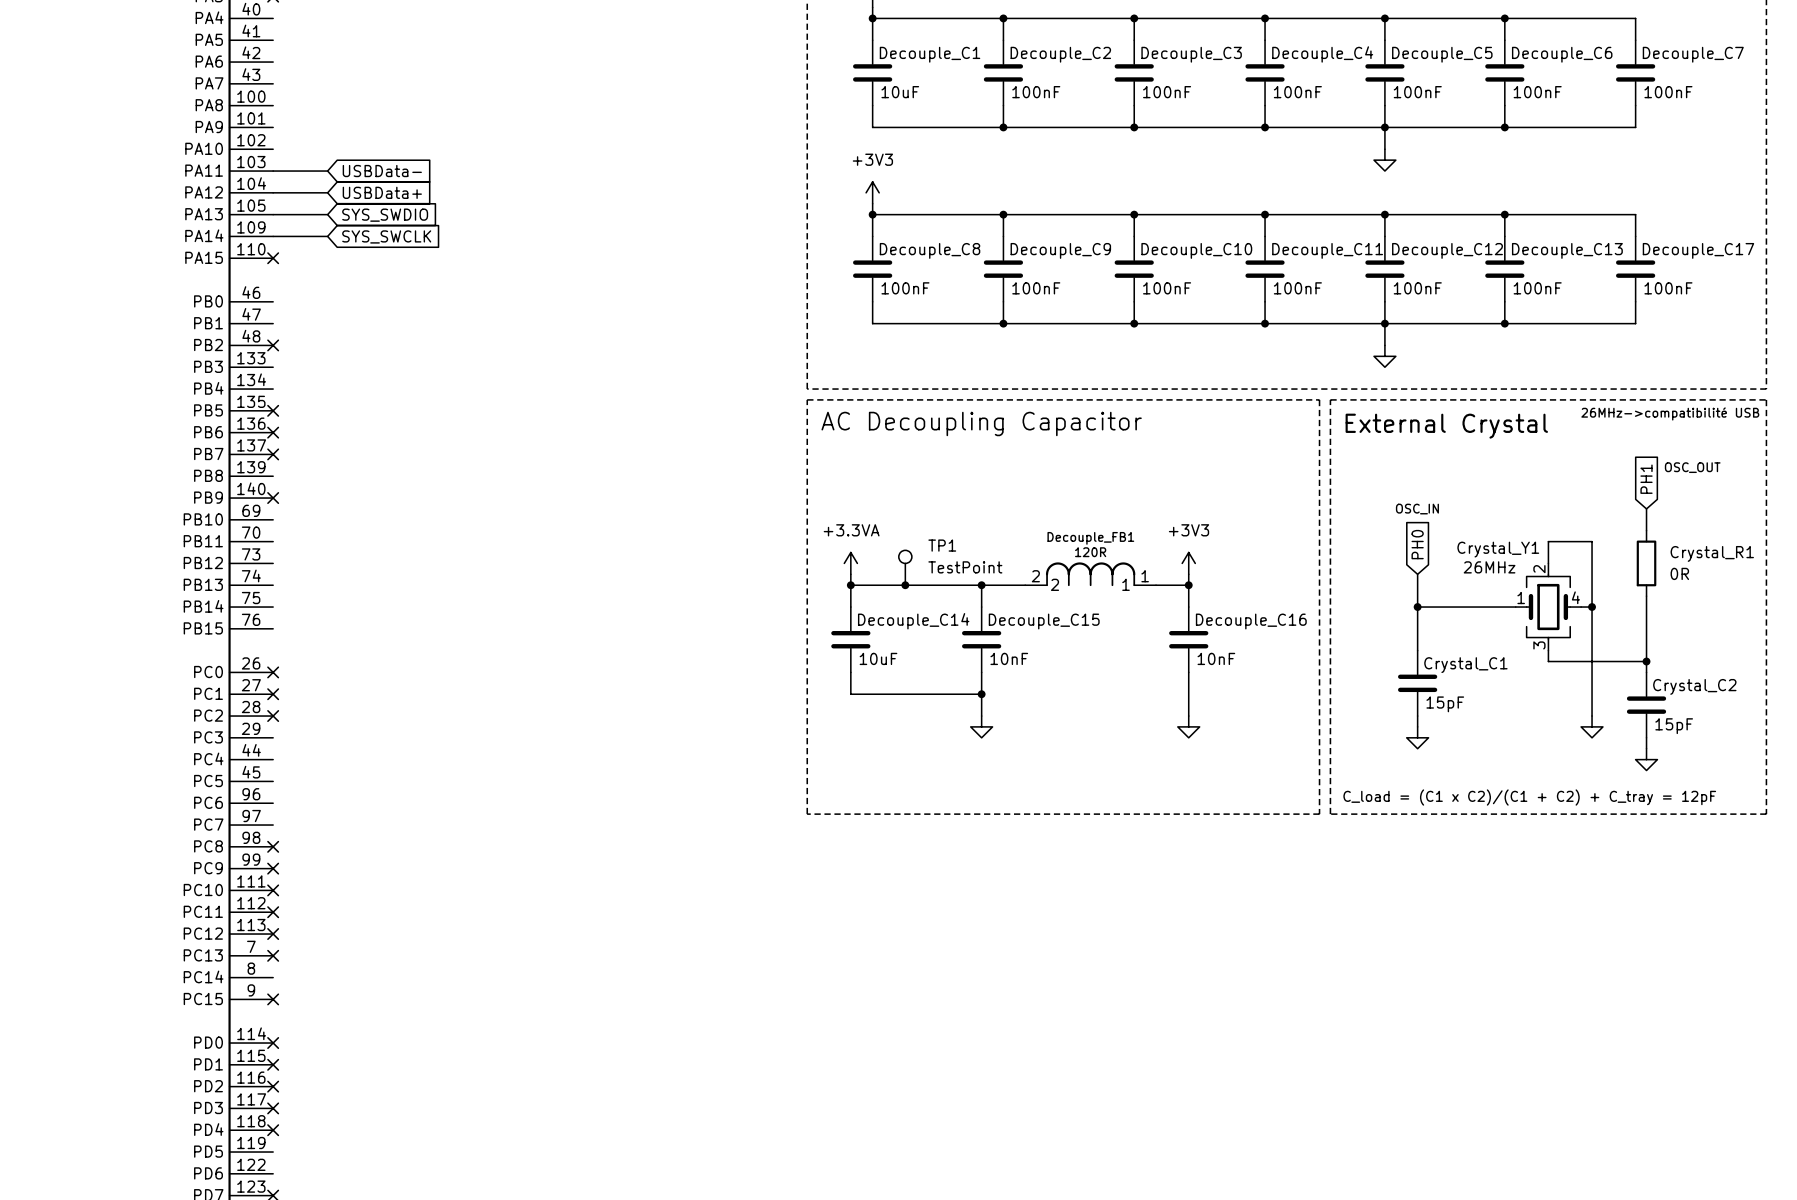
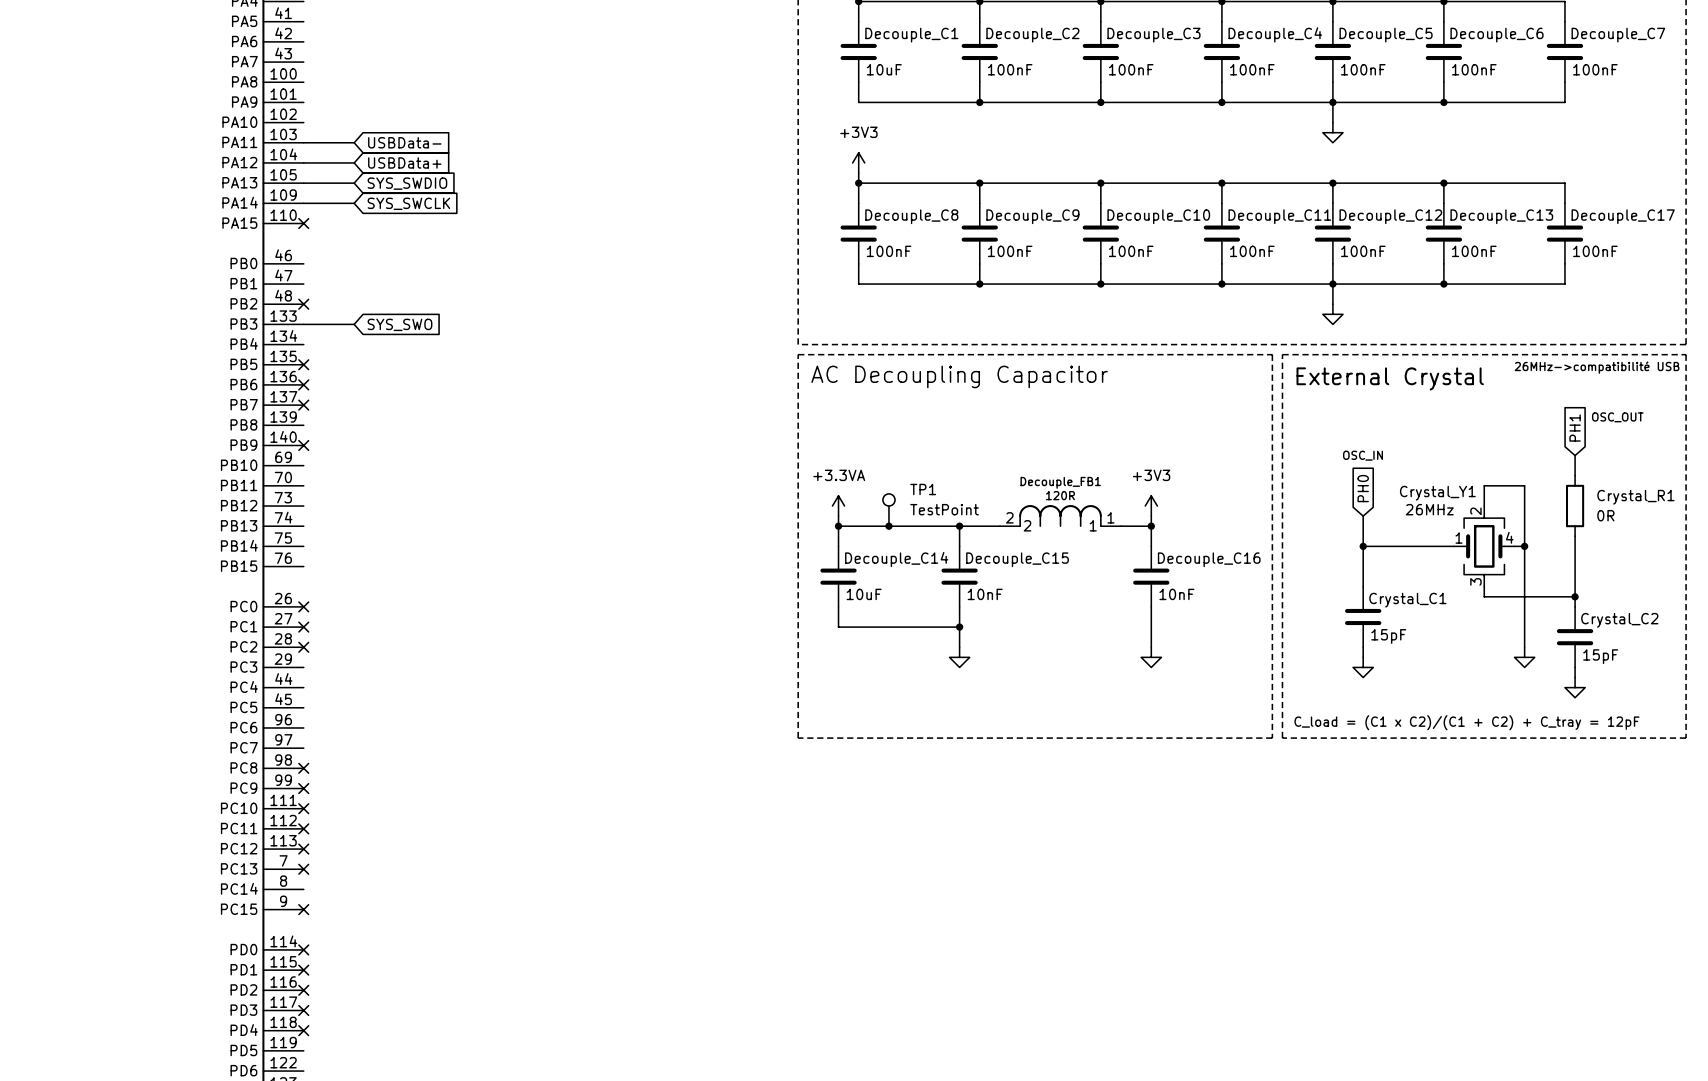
wire: none -> (303, 324) (354, 324)
global label: none -> SYS_SWO (399, 324)

